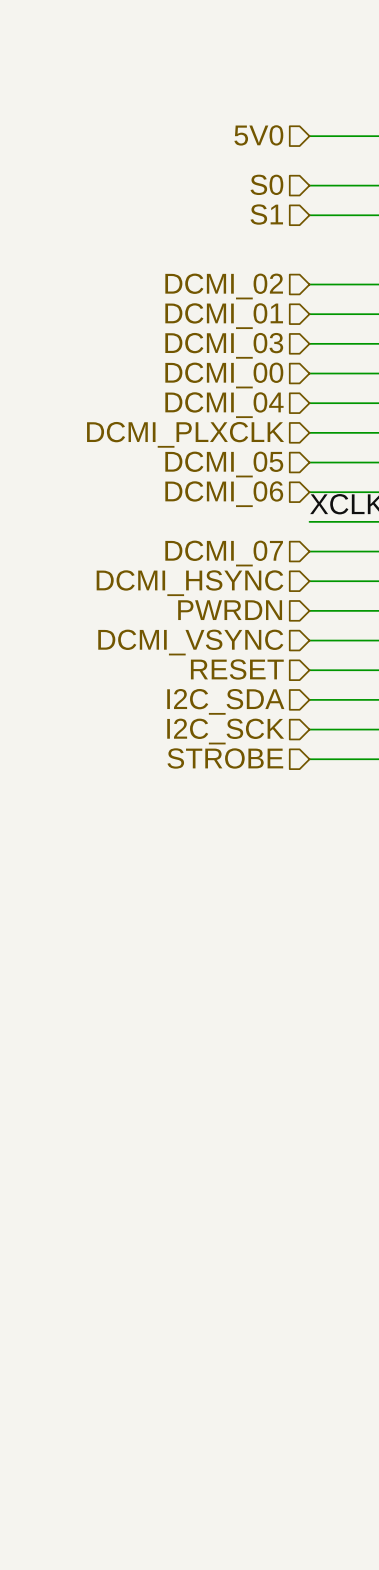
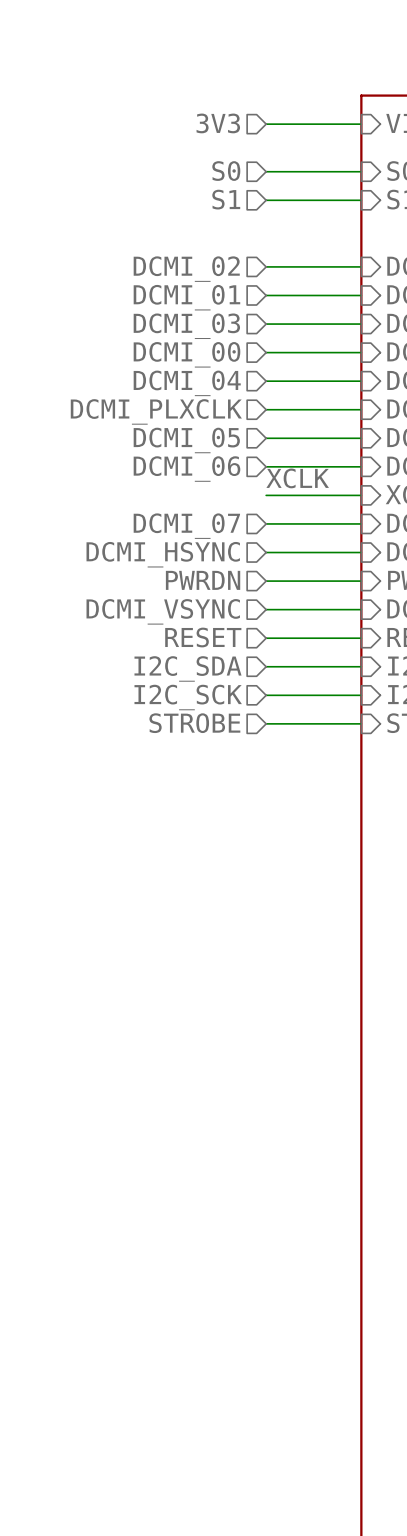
hierarchical label: 5V0 (258, 135) -> 3V3 (218, 123)

